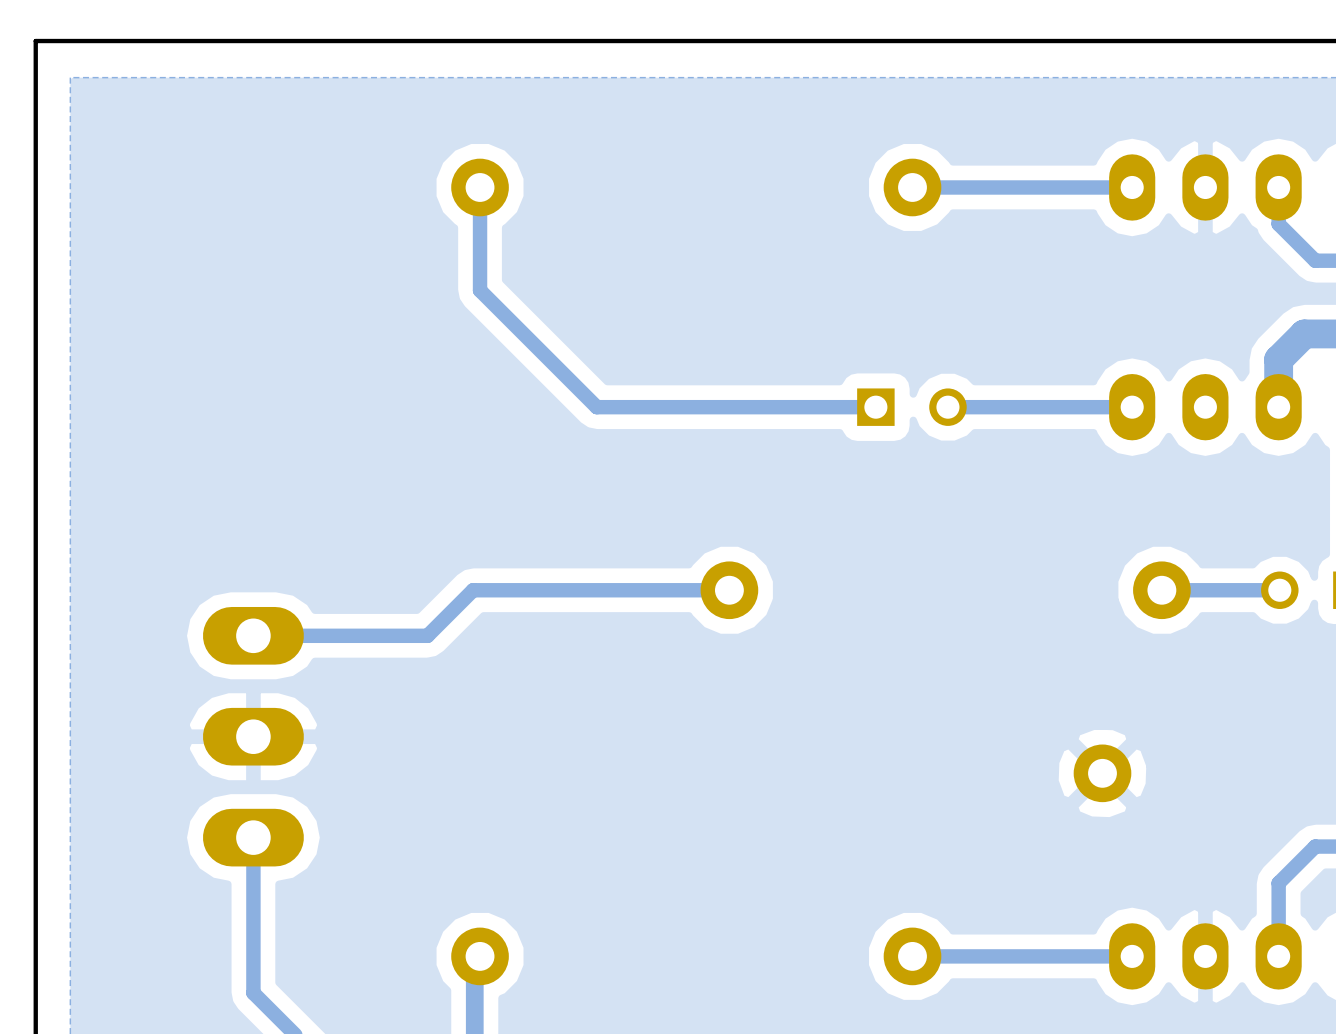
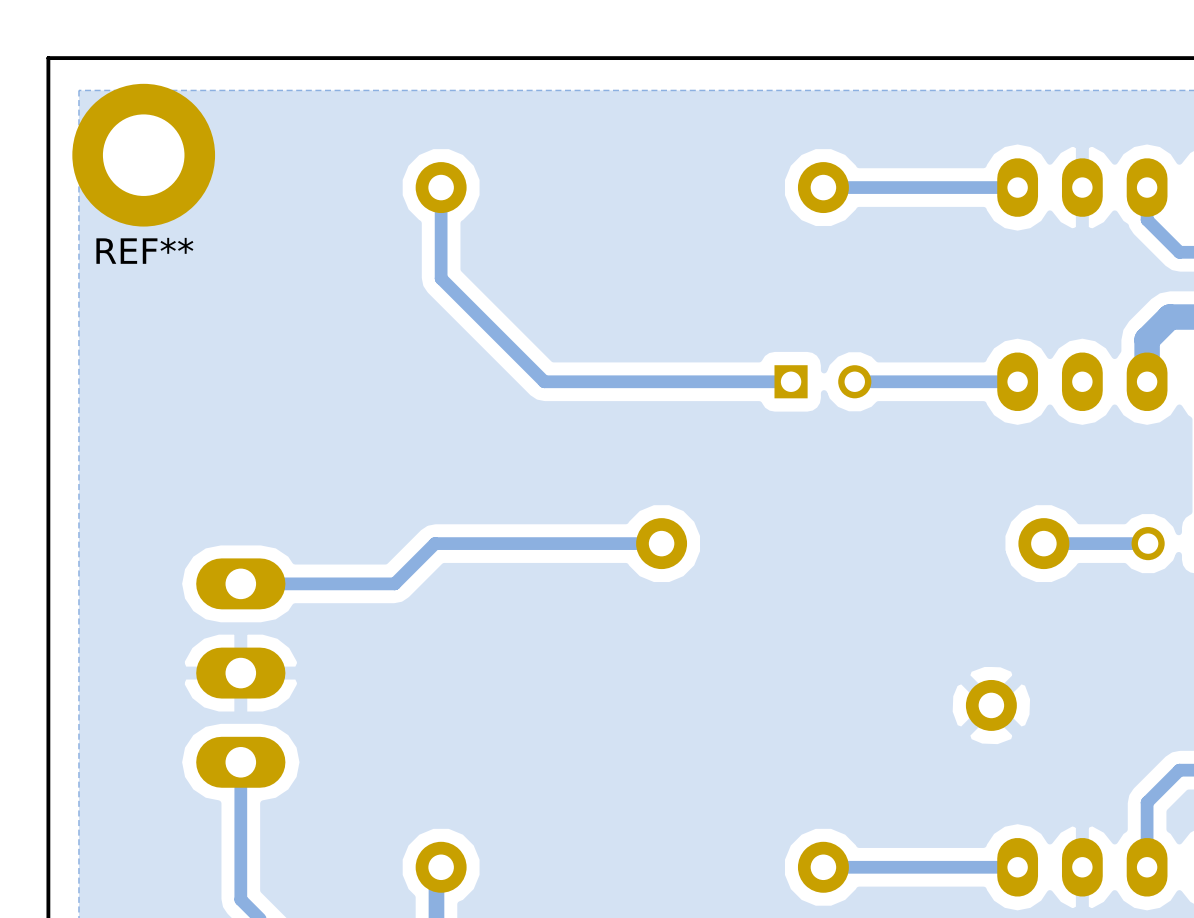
REF**: none -> (143, 155)

